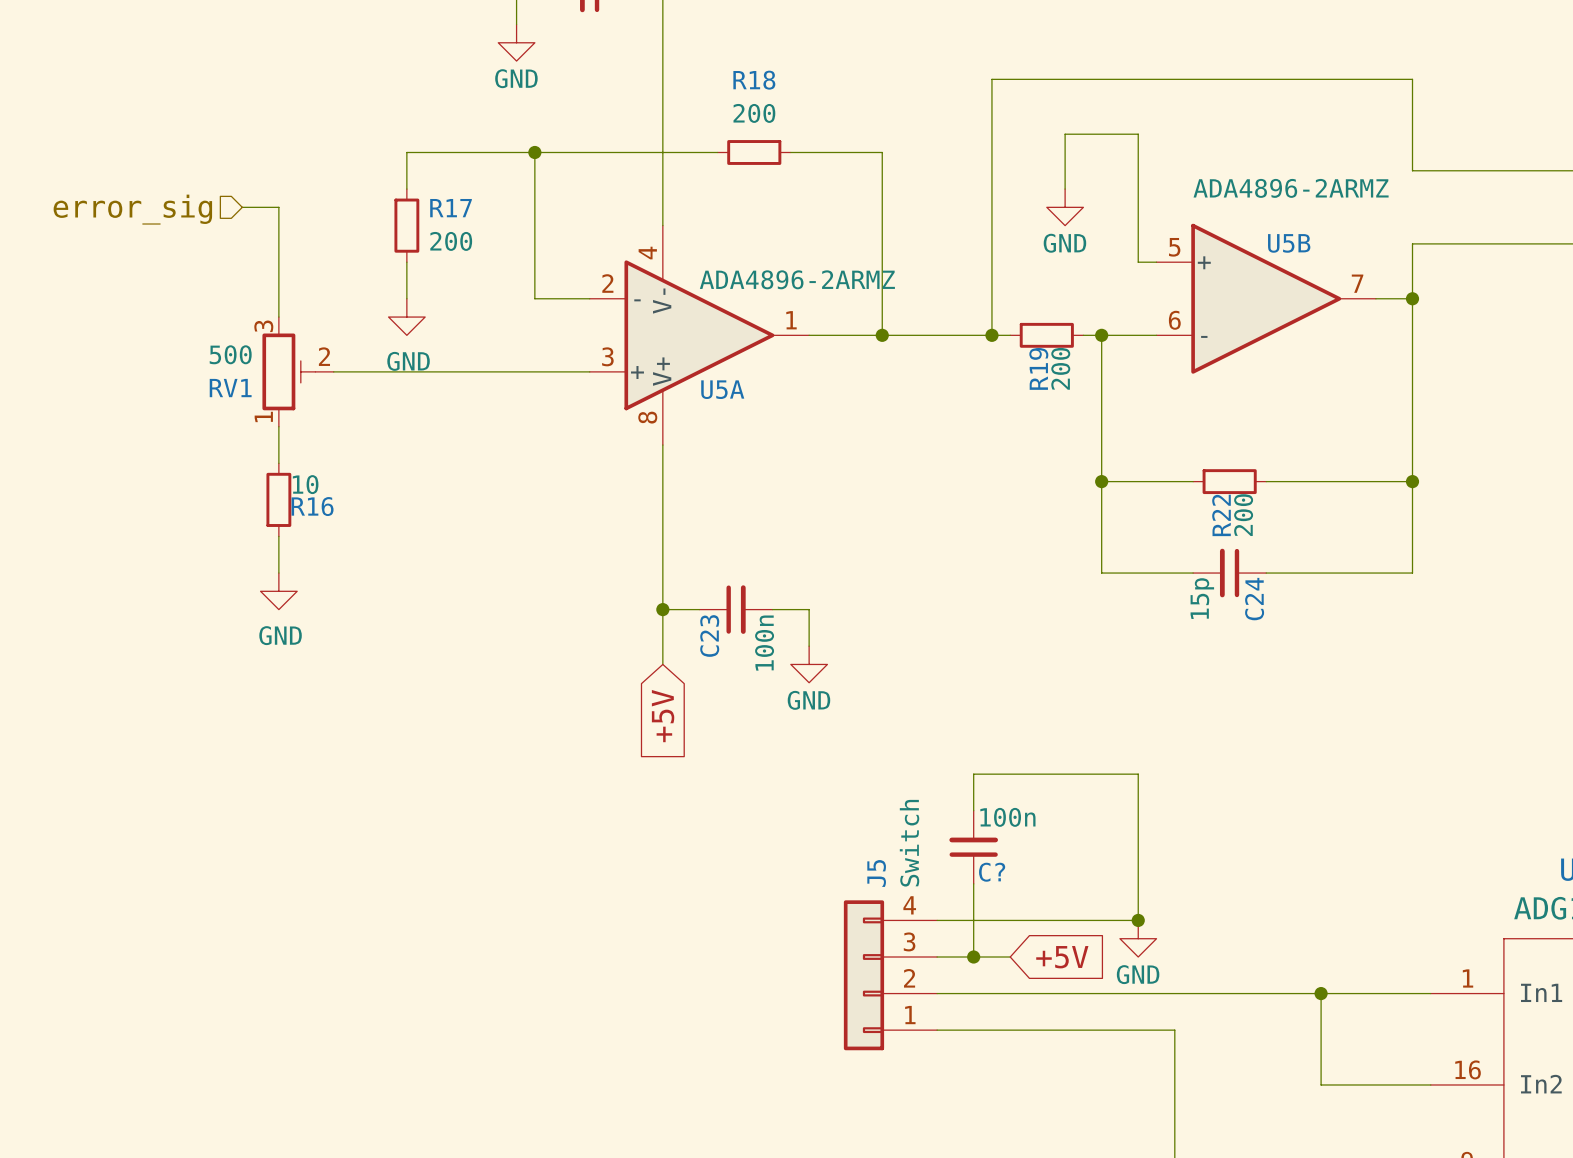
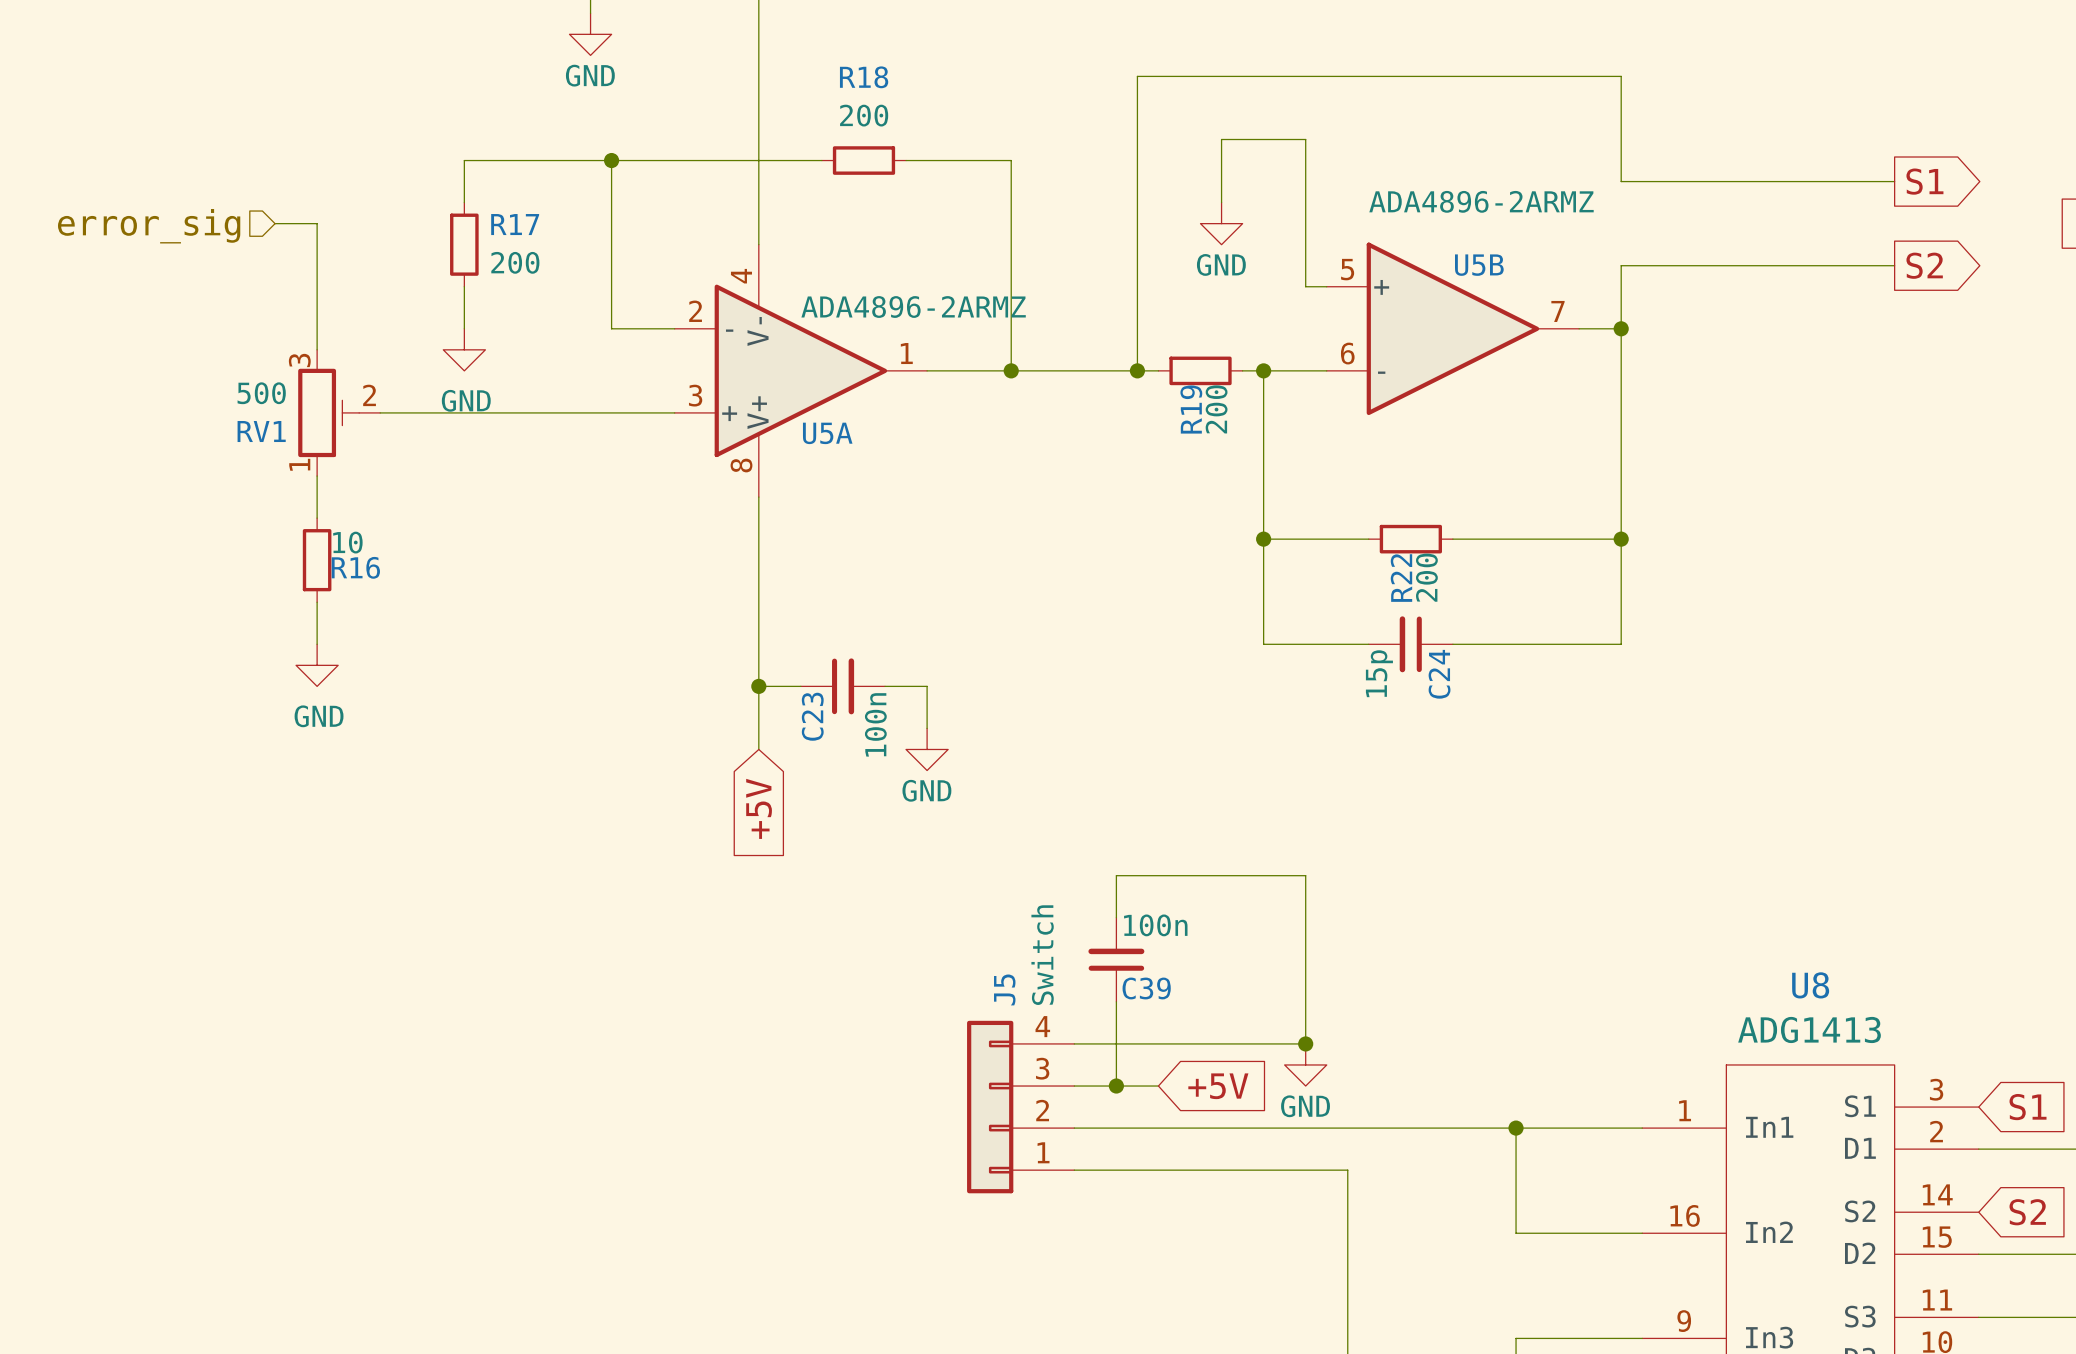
C? name: C? (992, 872) -> C39 (1146, 988)

